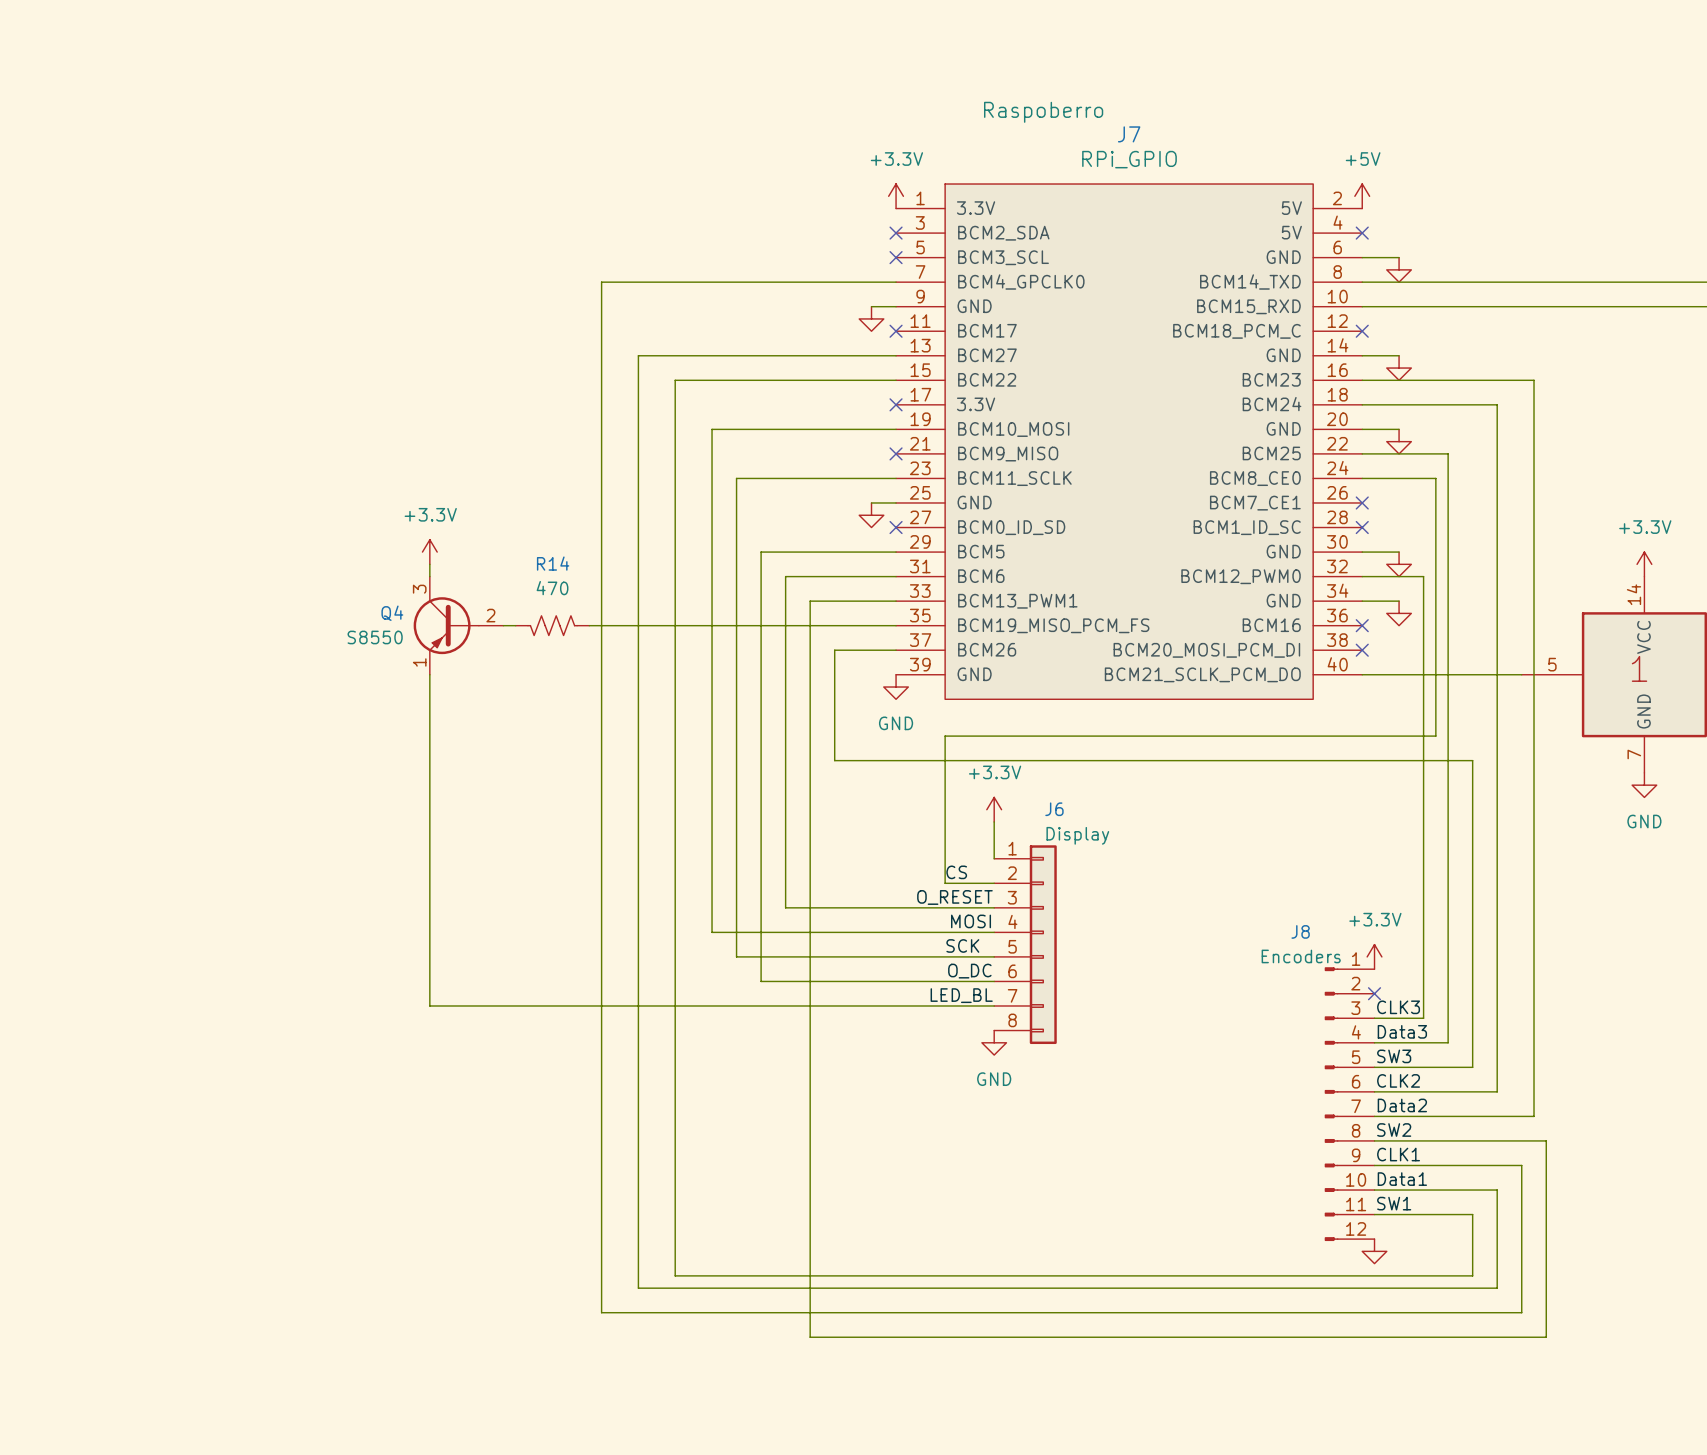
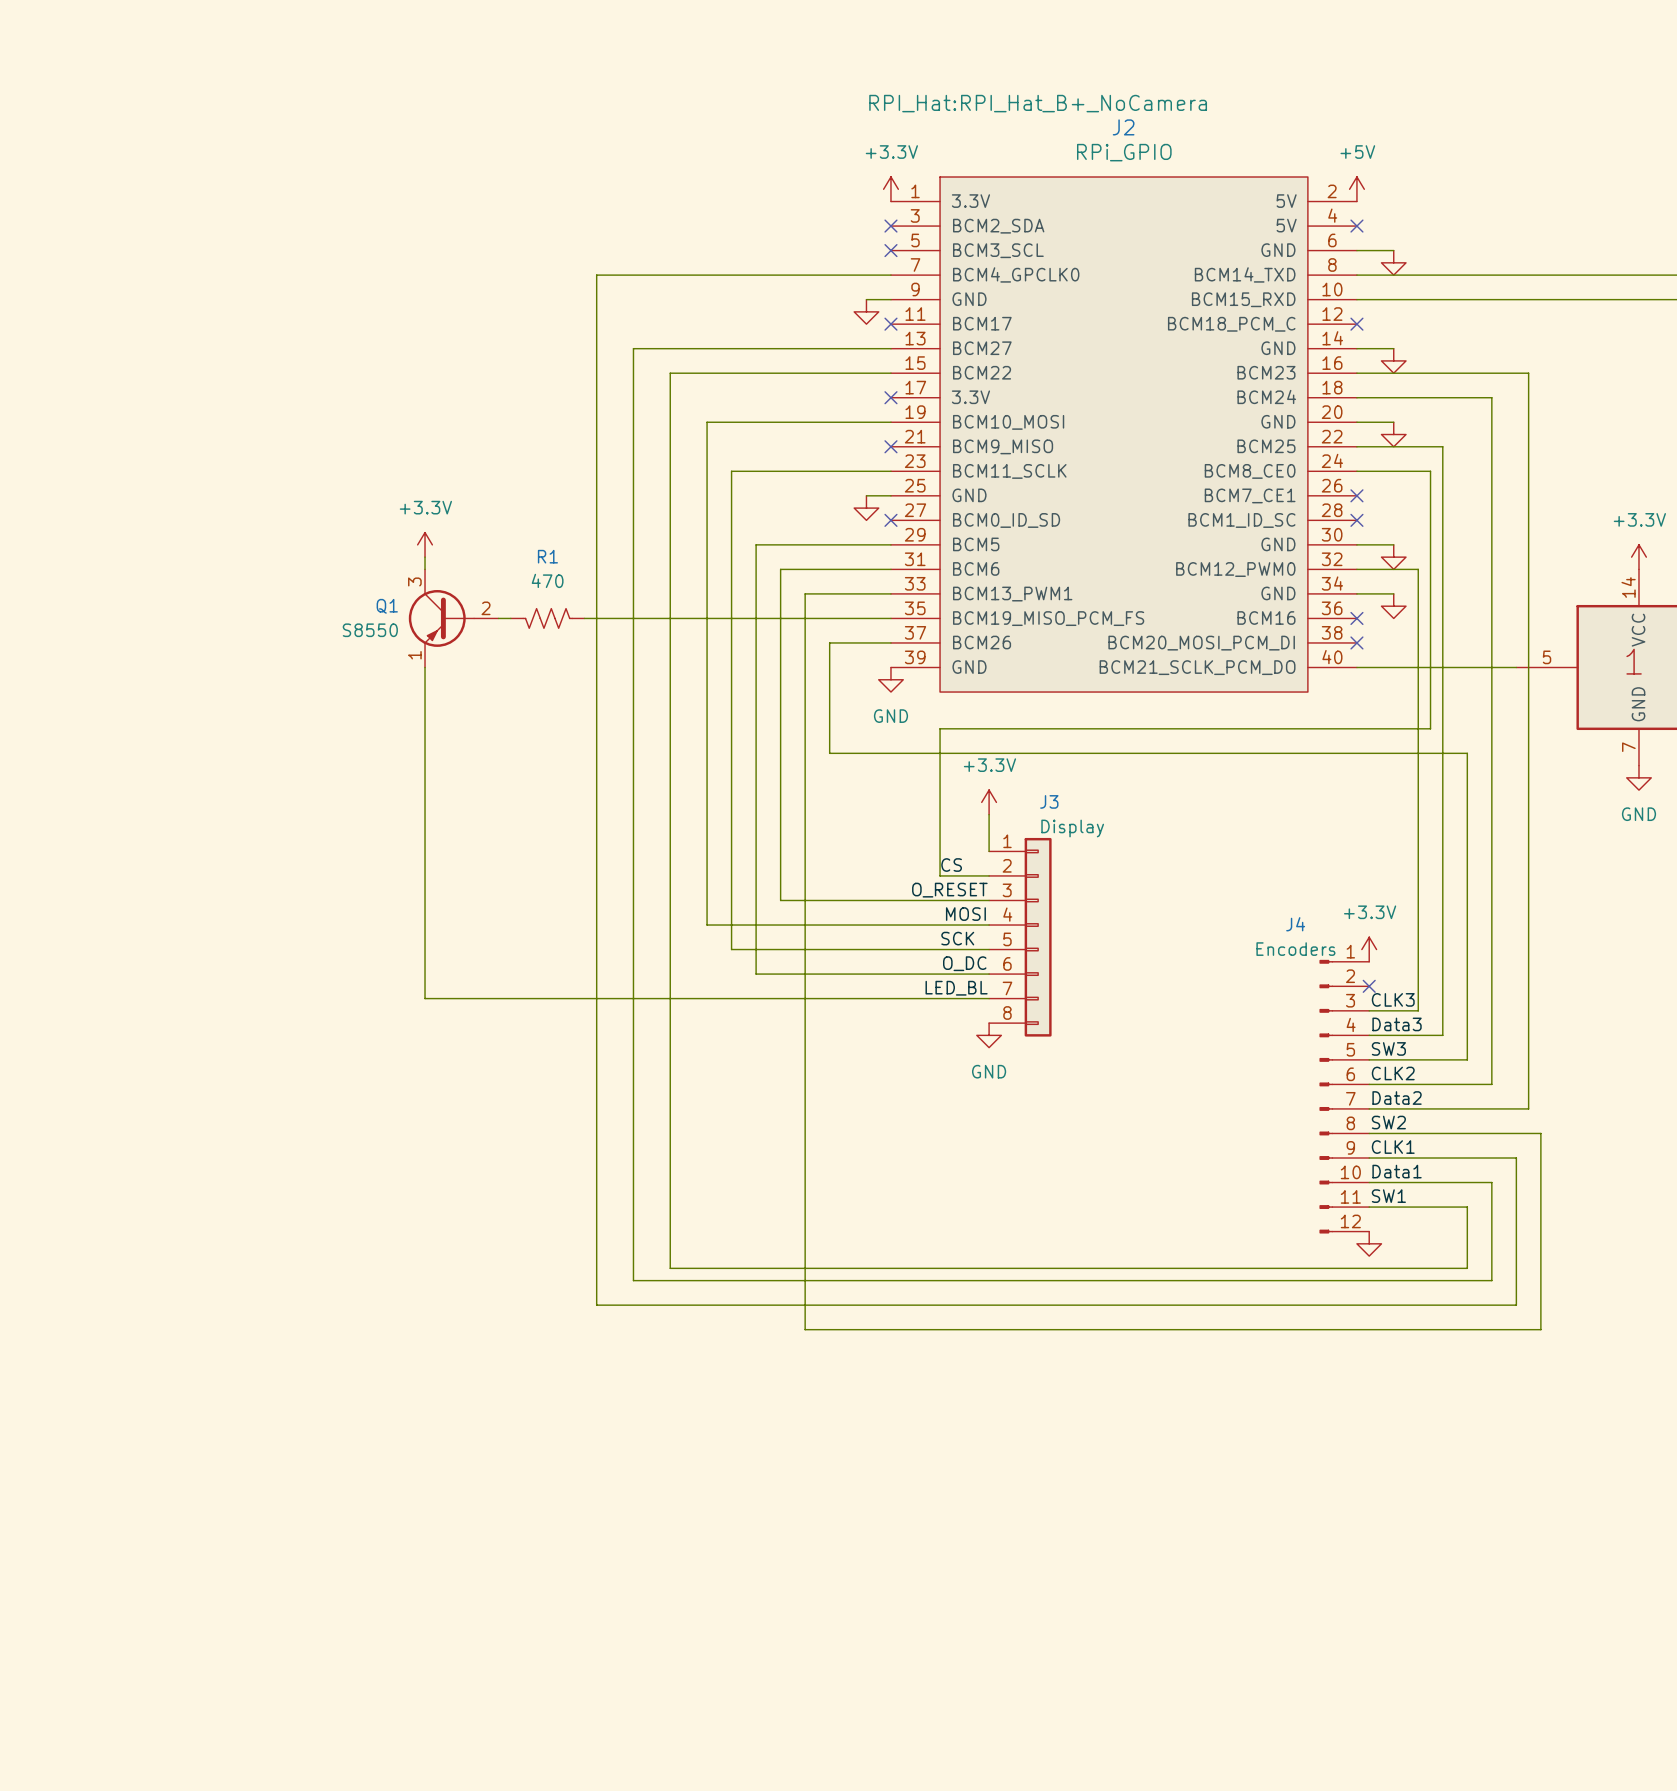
J7 text: Raspoberro (1043, 112) -> RPI_Hat:RPI_Hat_B+_NoCamera (1038, 103)
J7 name: J7 (1129, 134) -> J2 (1123, 127)
R14 name: R14 (553, 563) -> R1 (547, 556)
Q4 name: Q4 (392, 613) -> Q1 (387, 606)
J6 name: J6 (1054, 809) -> J3 (1049, 801)
J8 name: J8 (1300, 931) -> J4 (1295, 924)

